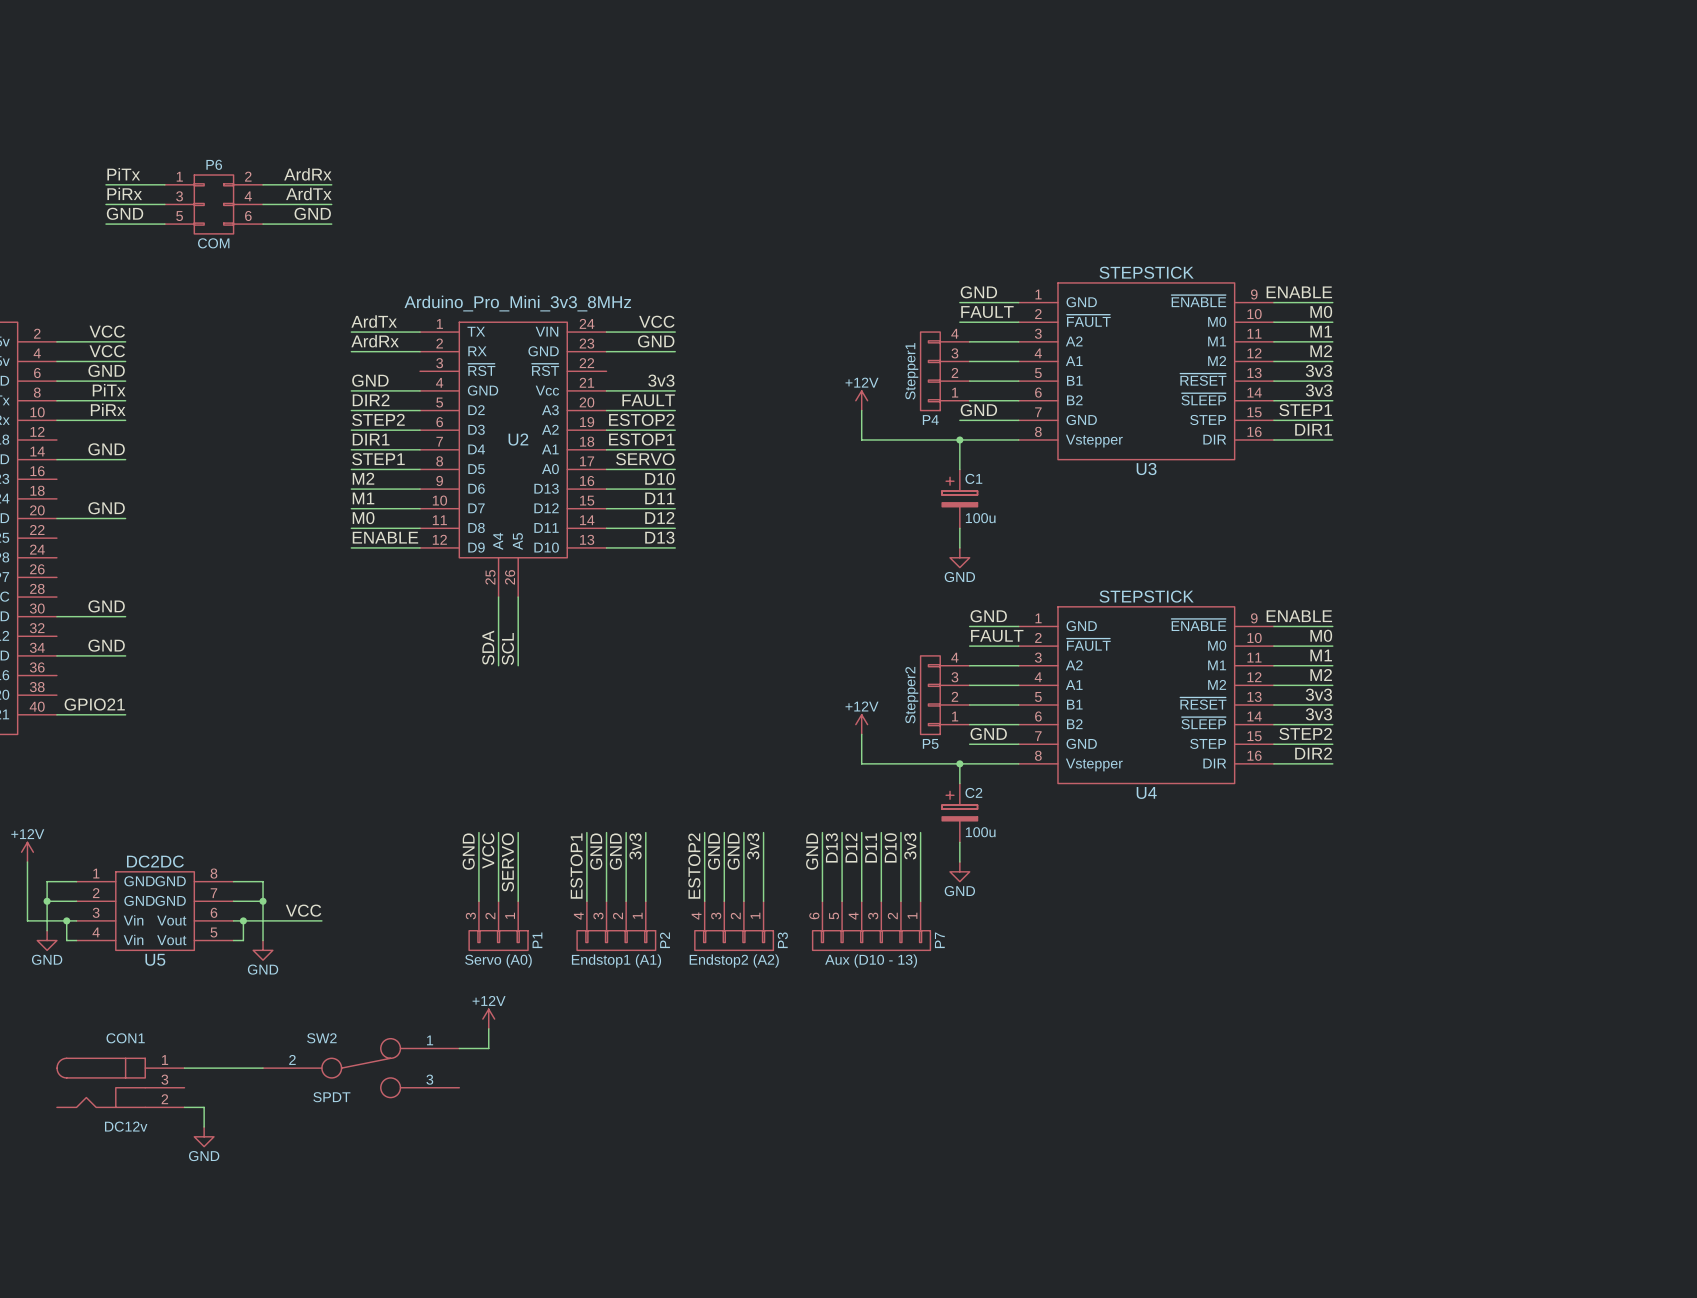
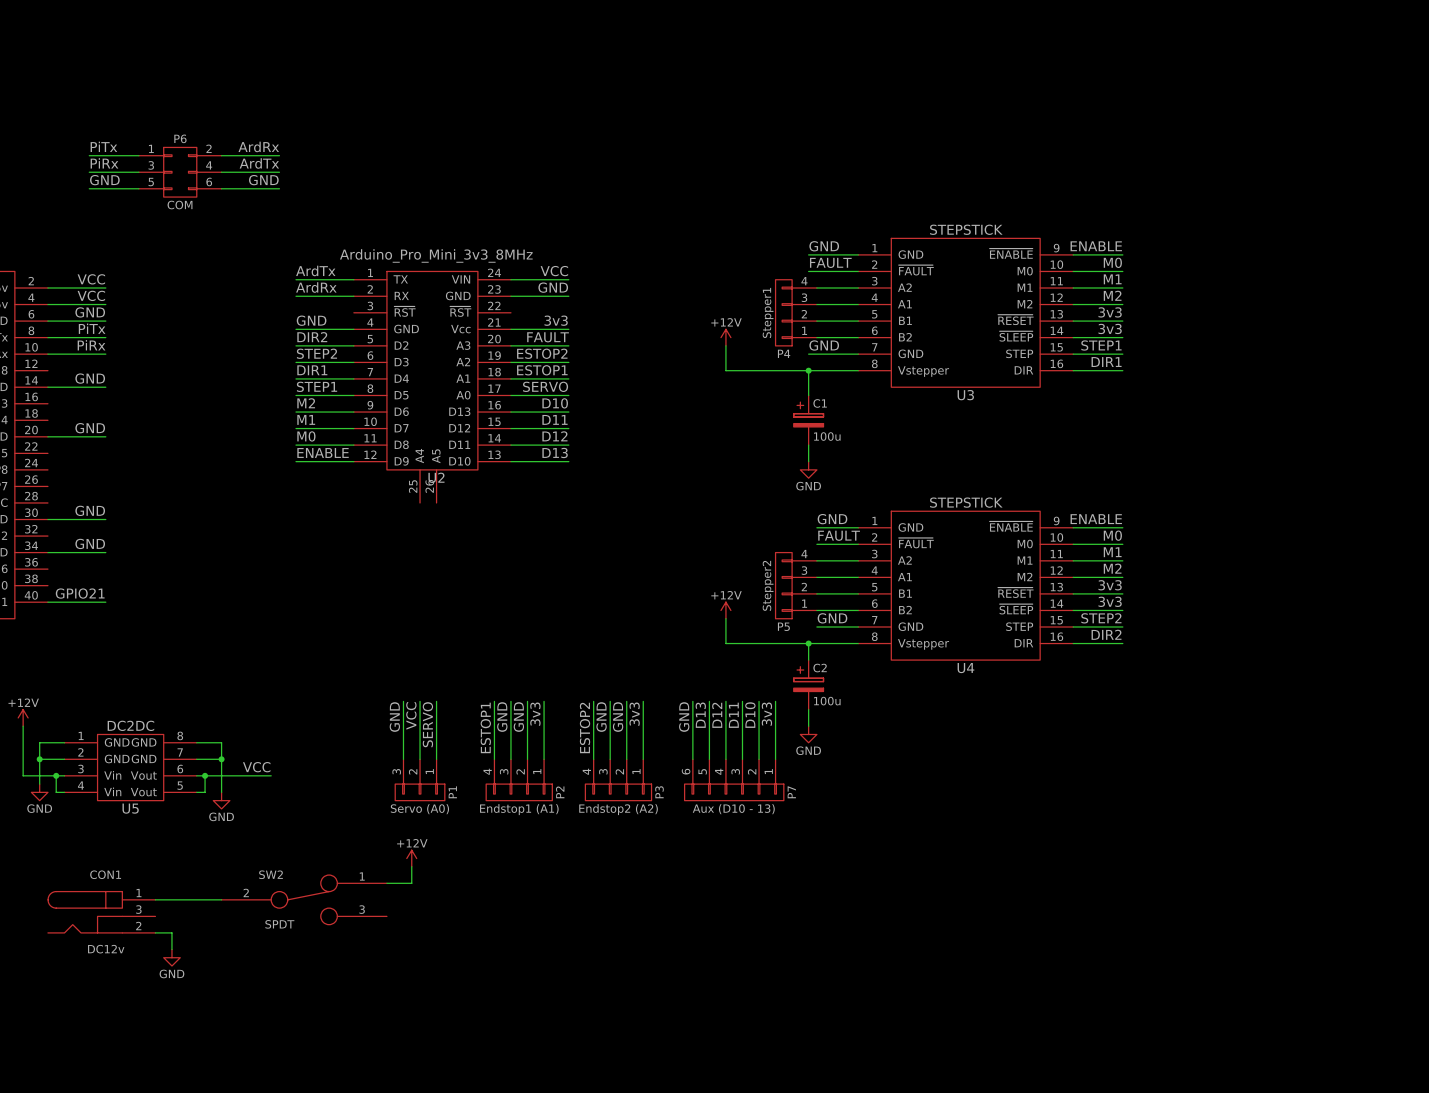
U2 name position: U2 (518, 439) -> U2 (436, 477)
wire: (498, 597) (498, 665) -> none
wire: (518, 597) (518, 665) -> none
label: SDA (488, 647) -> none
label: SCL (507, 648) -> none

